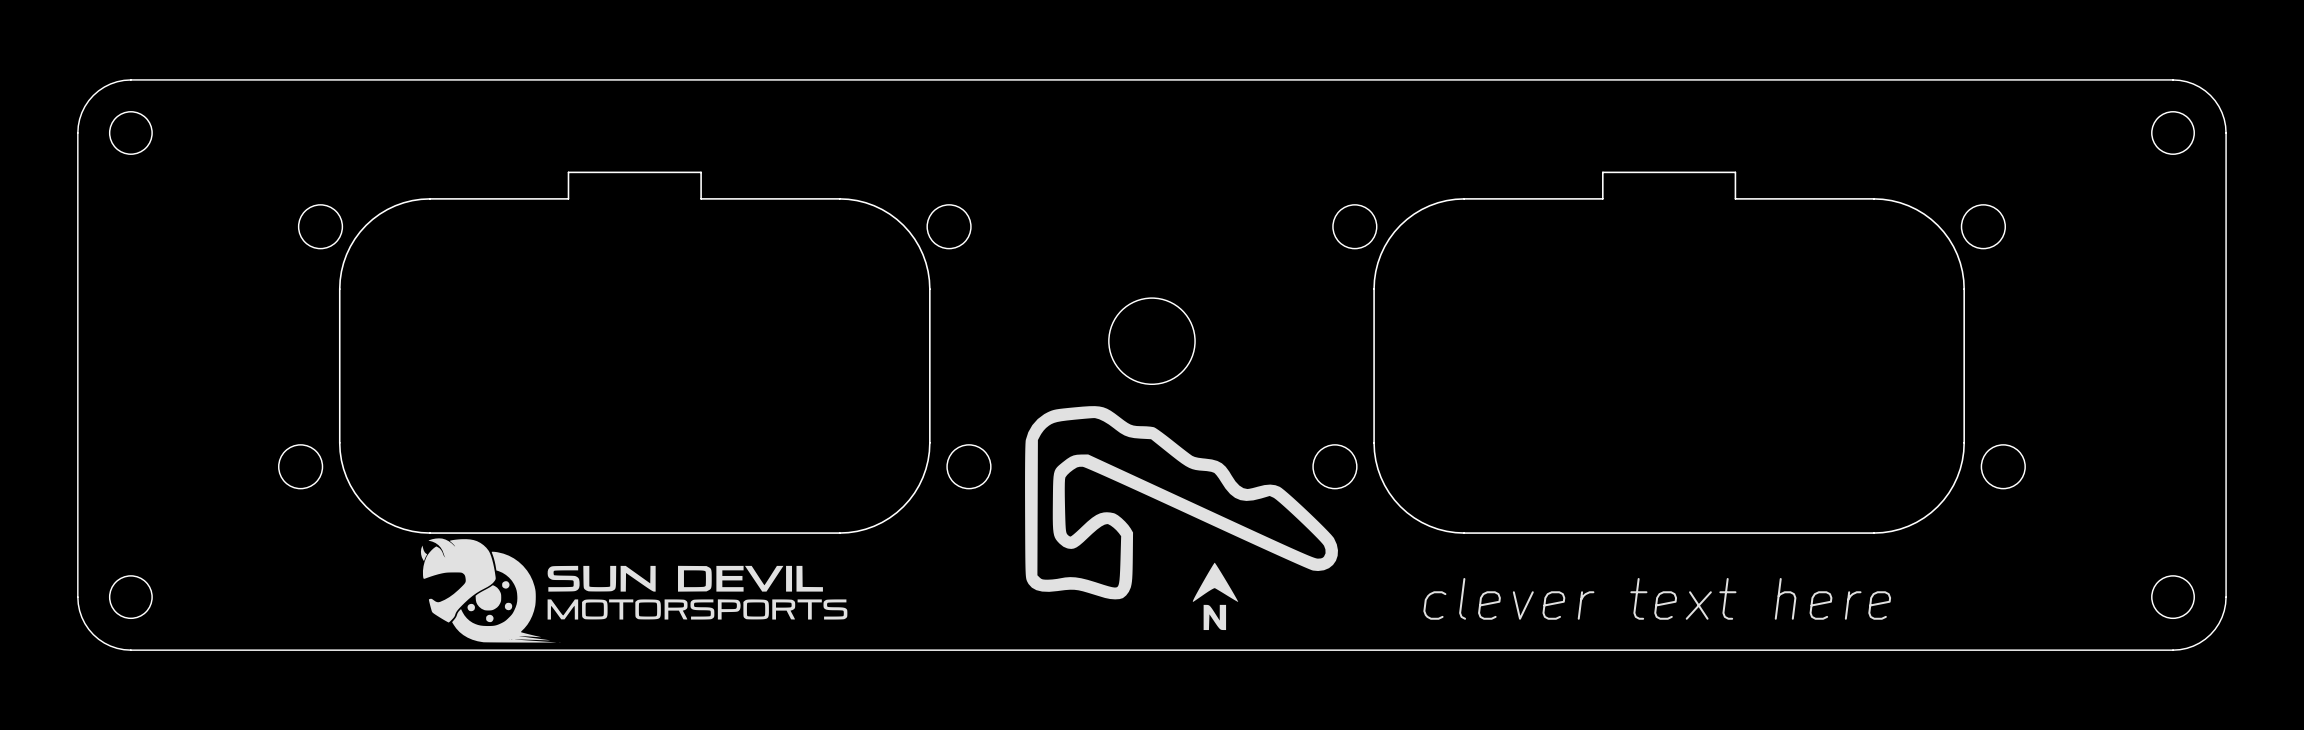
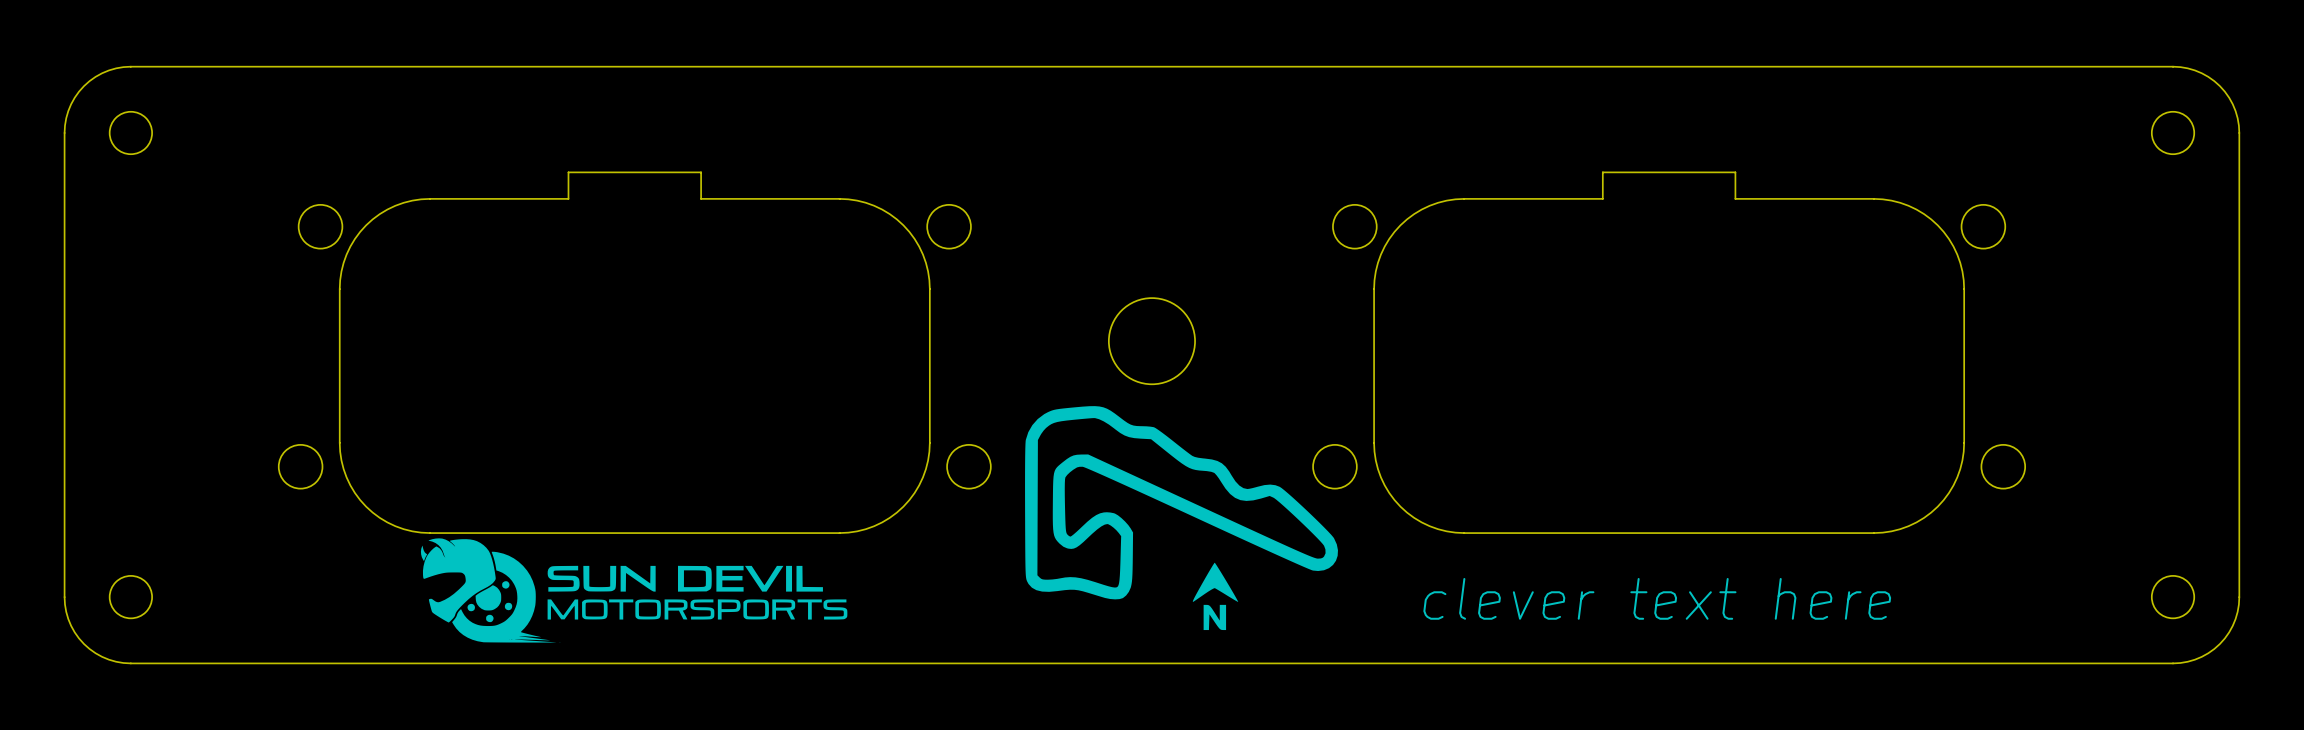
board edge: (130, 79) (2173, 79) (2186, 81) (2199, 87) (2210, 95) (2222, 112) (2225, 126) (2226, 597) (2224, 610) (2215, 629) (2205, 639) (2186, 648) (2173, 650) (130, 650) (117, 648) (104, 643) (93, 634) (81, 617) (78, 604) (77, 132) (81, 112) (93, 95) (110, 83) (130, 79) -> (130, 66) (108, 70) (95, 76) (84, 86) (74, 97) (68, 111) (64, 132) (64, 604) (71, 625) (84, 643) (102, 656) (116, 661) (130, 663) (2173, 663) (2194, 659) (2214, 648) (2229, 632) (2237, 611) (2239, 597) (2238, 125) (2232, 104) (2224, 91) (2208, 76) (2187, 68) (2173, 66) (130, 66)

